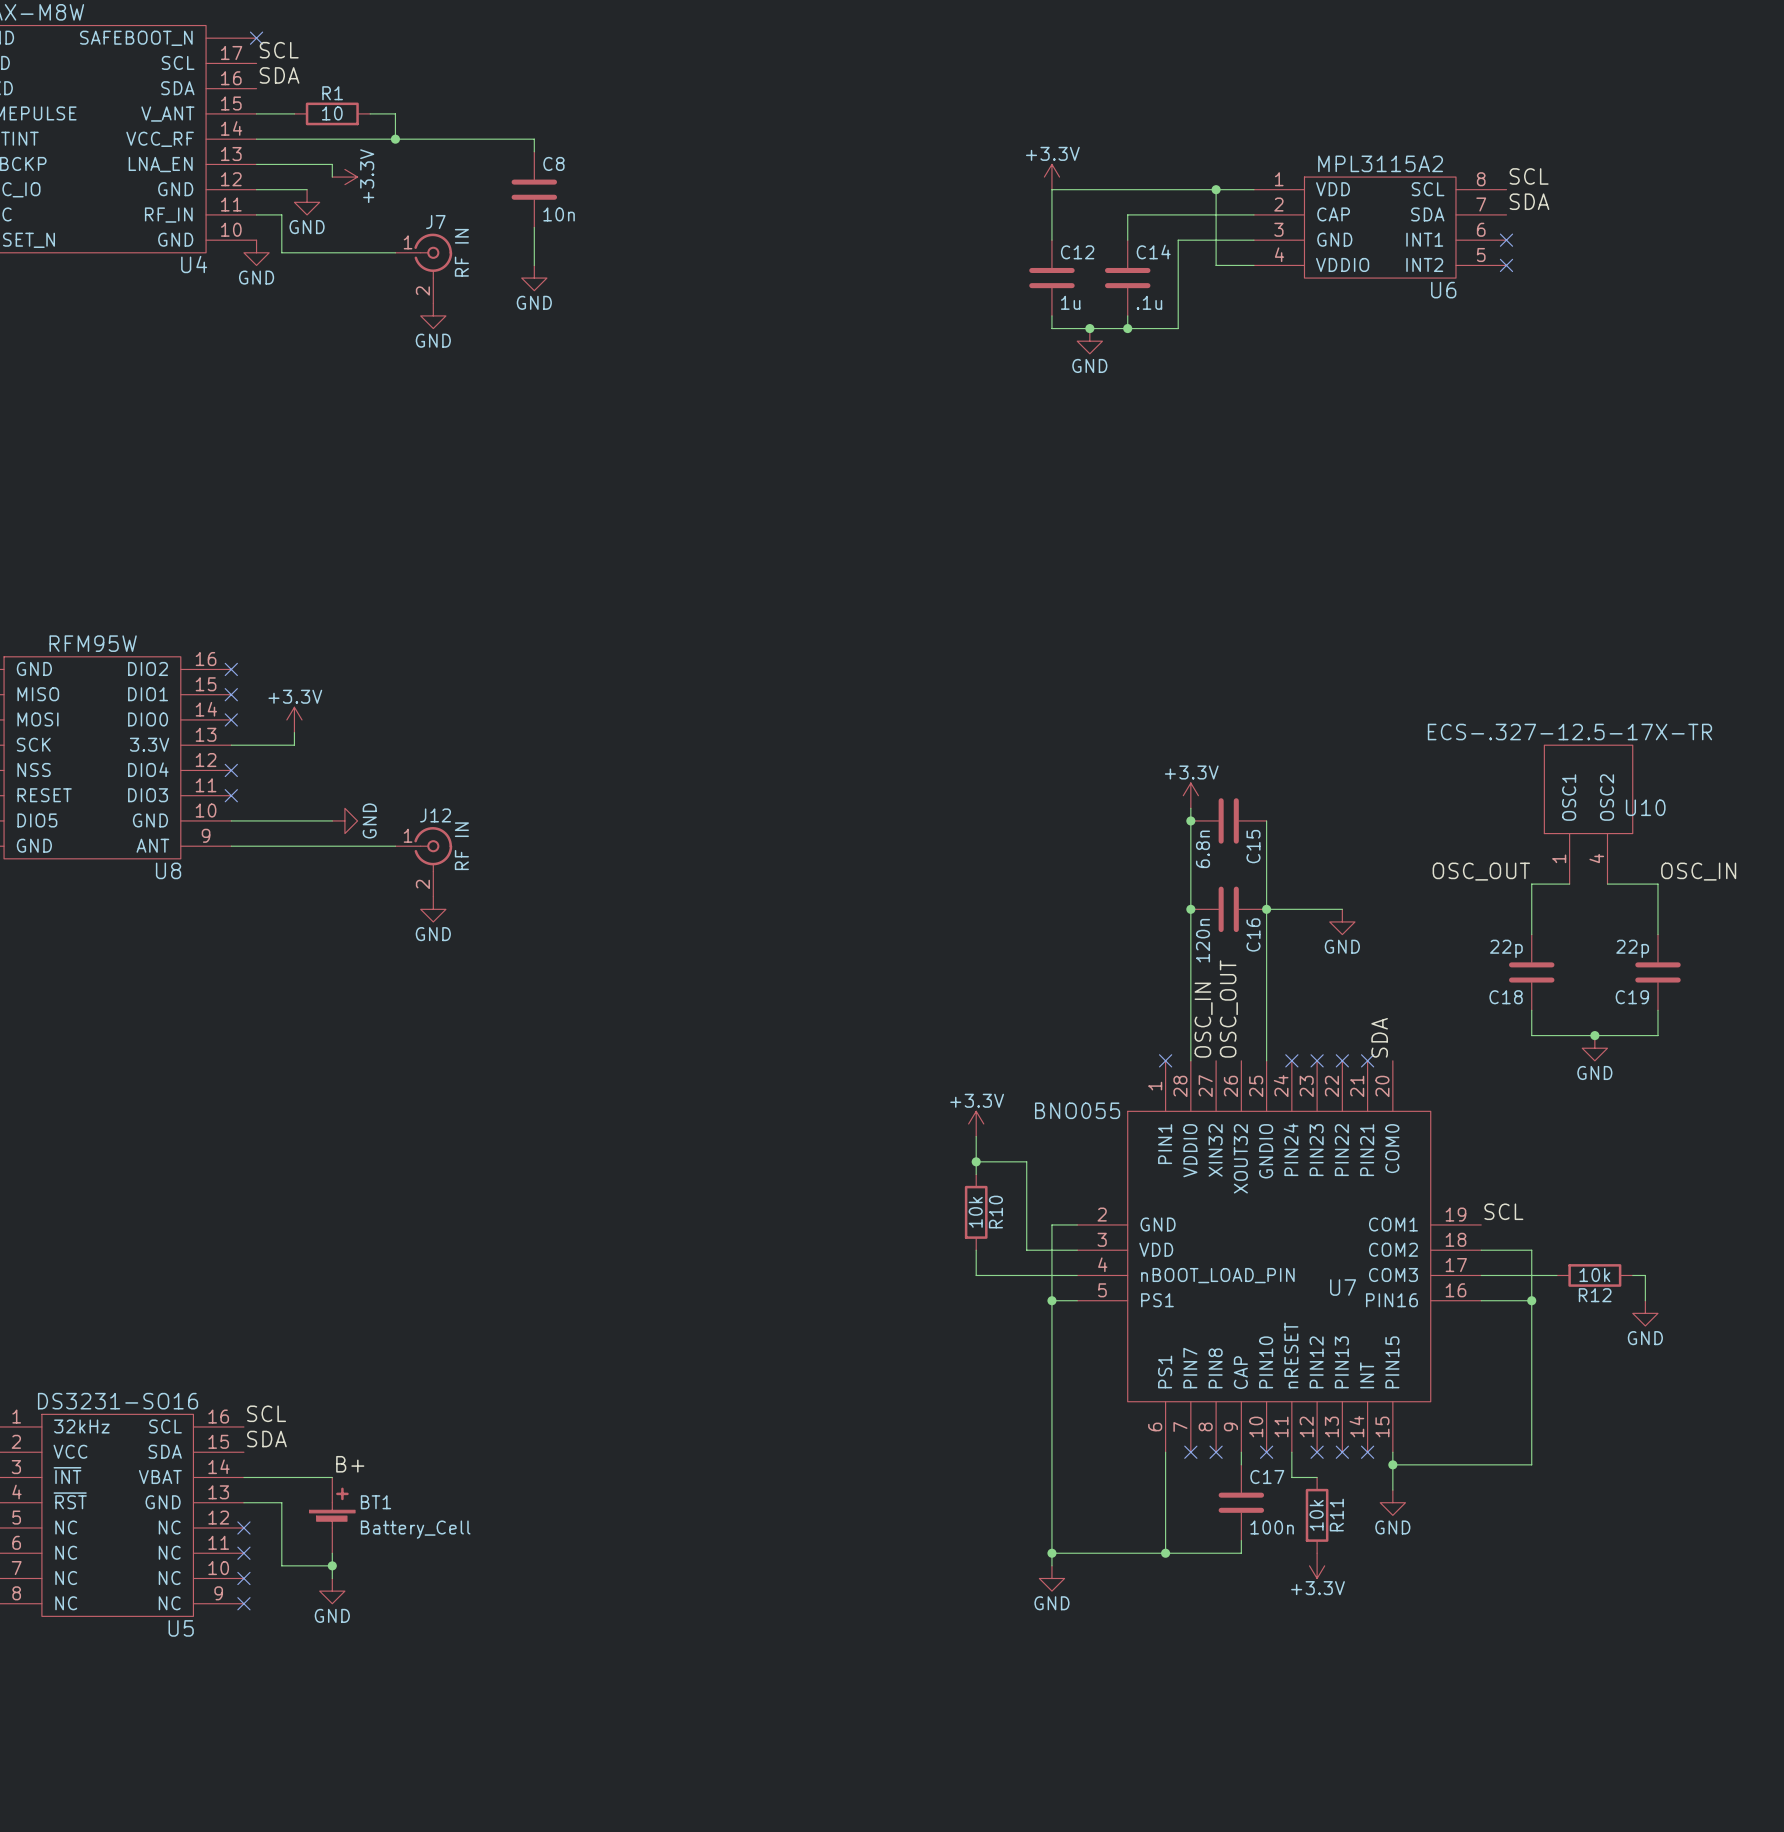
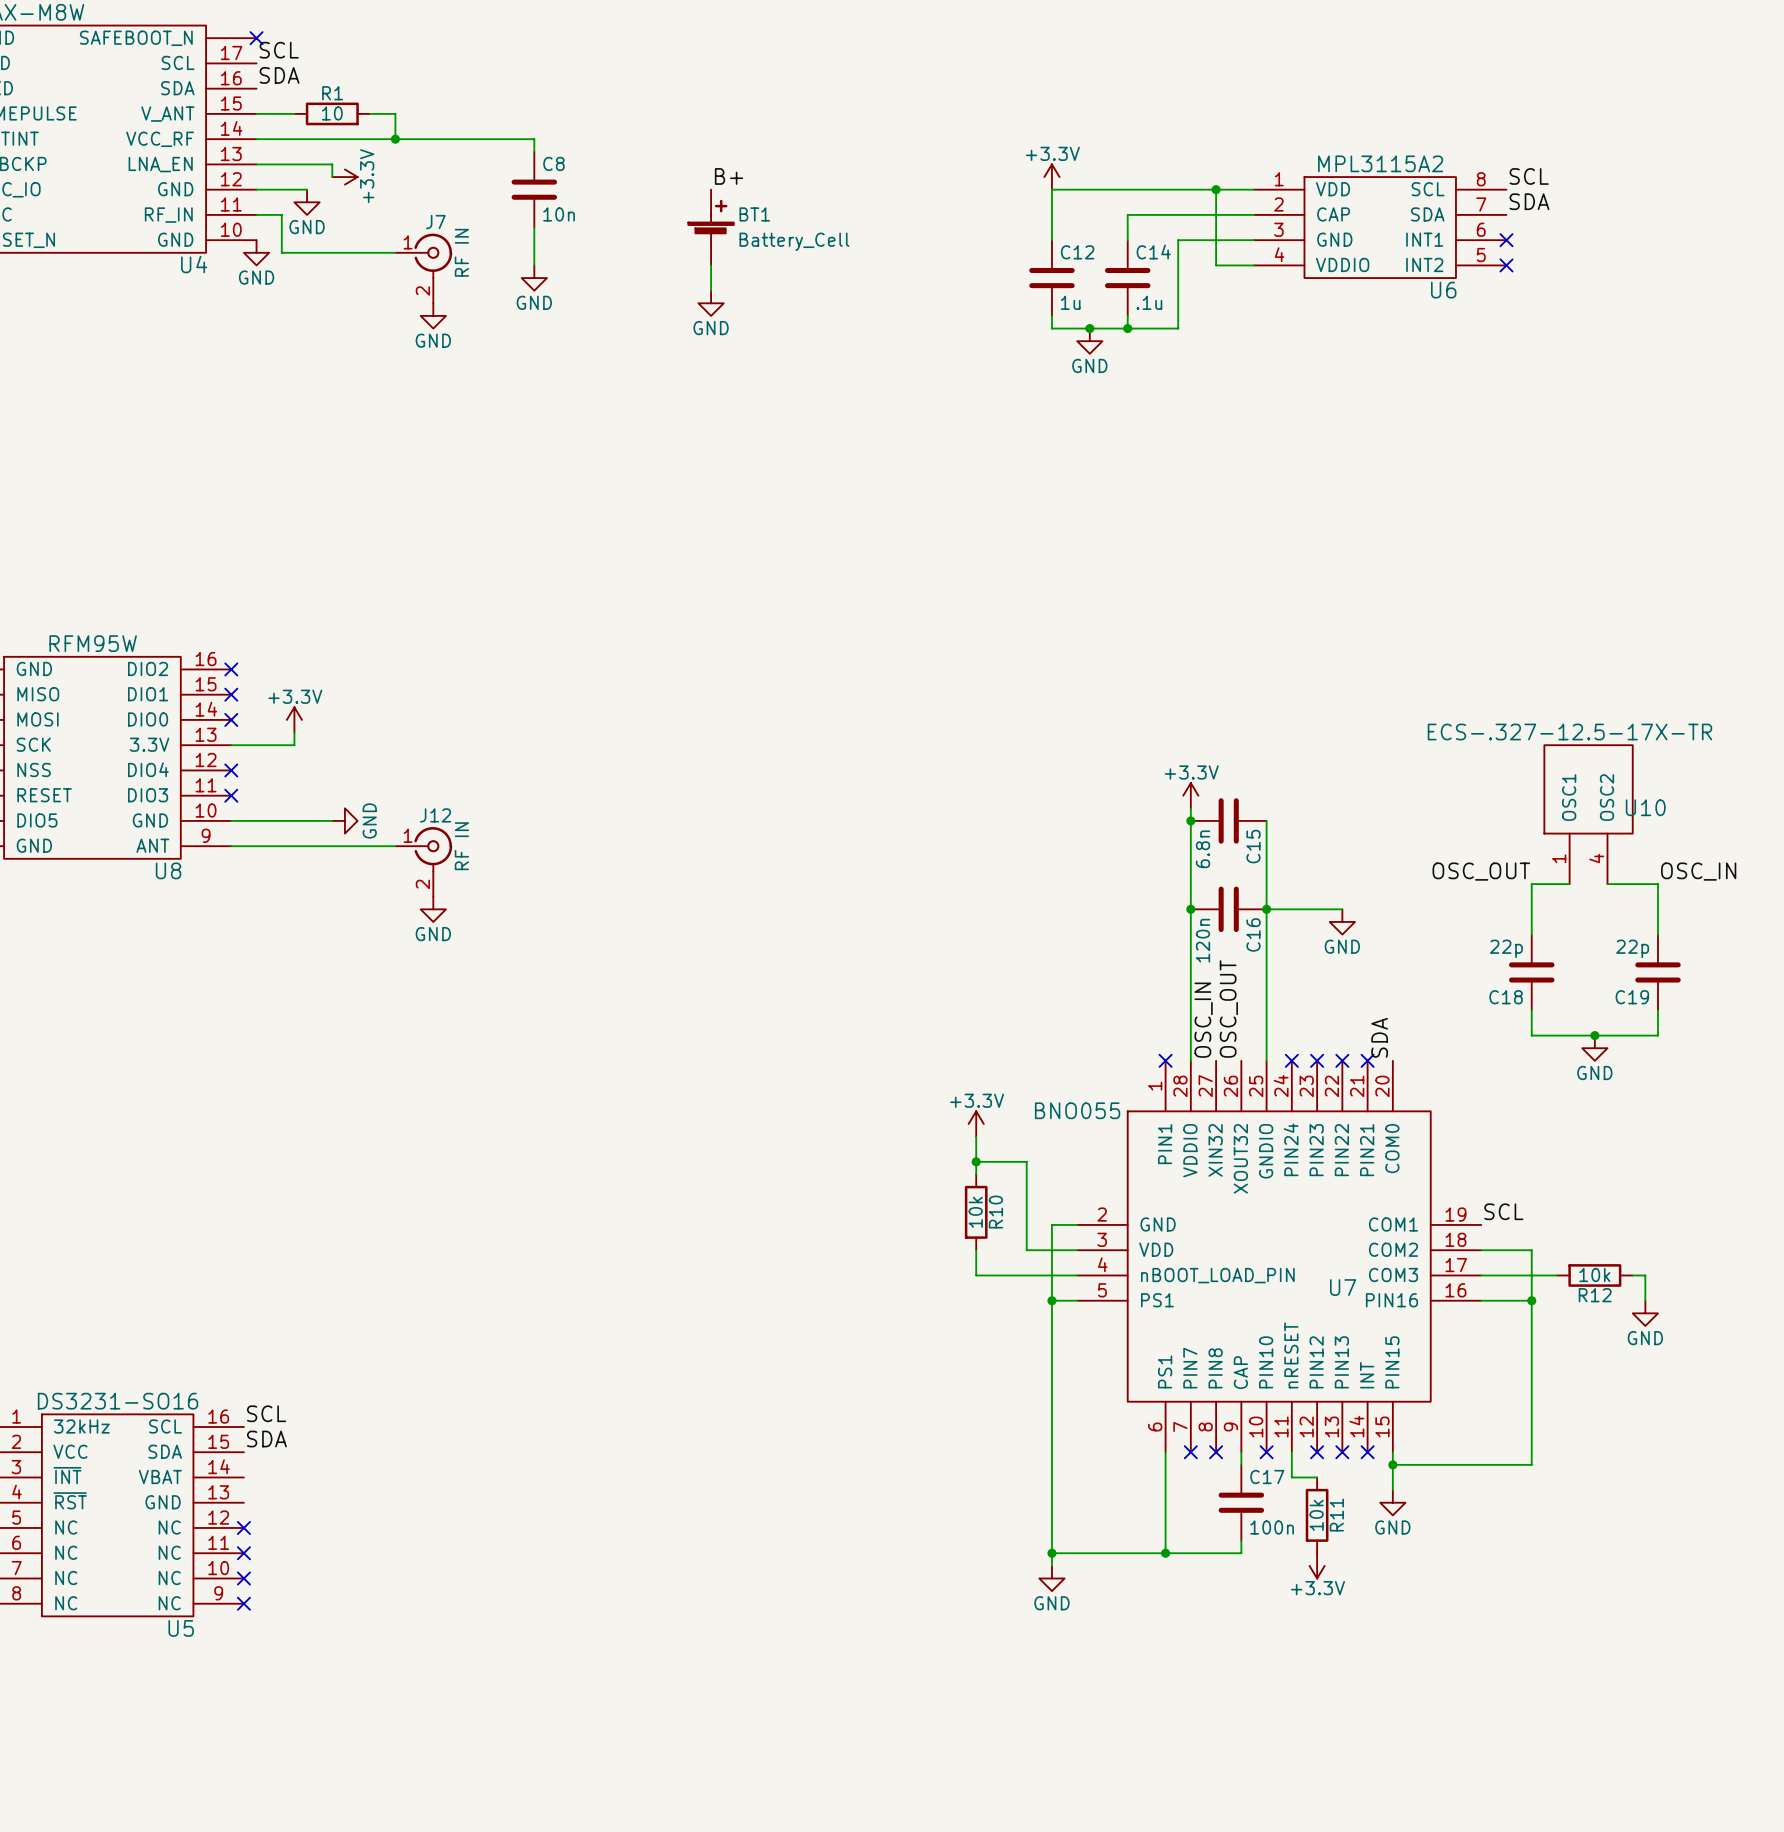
label: none -> B+ (729, 176)
wire: none -> (711, 265) (711, 290)
power symbol: none -> GND (711, 303)
label: B+ (350, 1464) -> none
wire: (243, 1477) (332, 1477) -> none
wire: (243, 1502) (281, 1502) (281, 1565) (332, 1565) -> none
BT1 position: (332, 1515) -> (711, 227)
wire: (332, 1553) (332, 1578) -> none
junction: (332, 1565) -> none
power symbol: GND (332, 1591) -> none

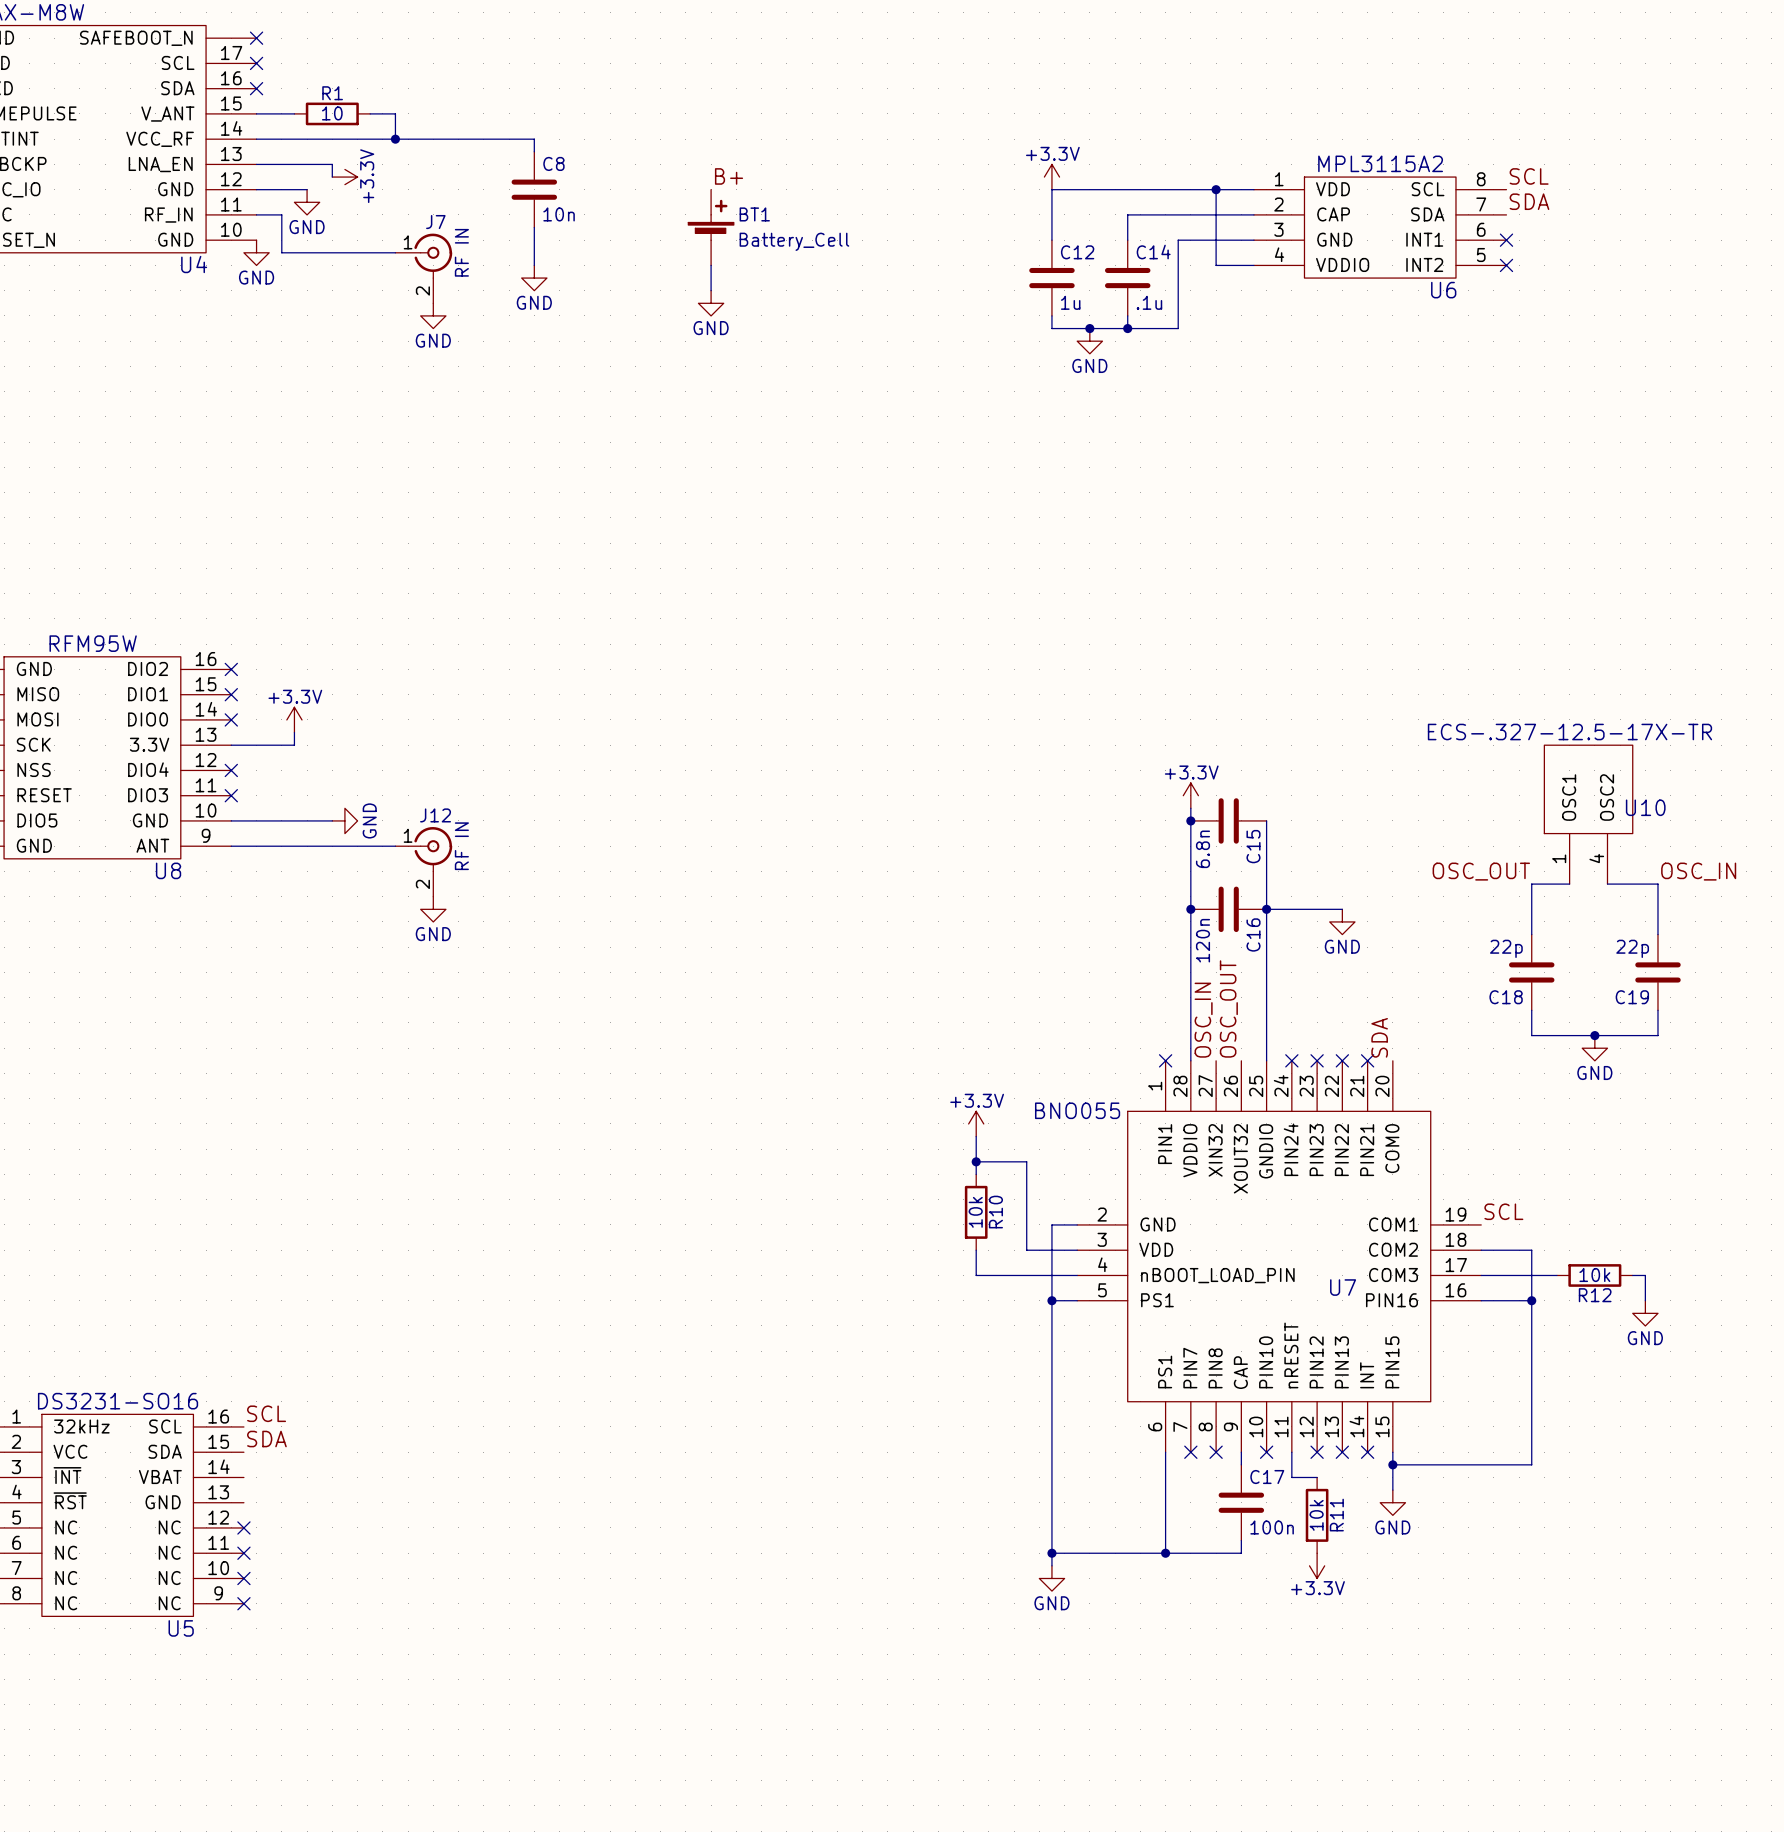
label: SCL (279, 50) -> none
no-connect mark: none -> (256, 63)
label: SDA (279, 75) -> none
no-connect mark: none -> (256, 88)

